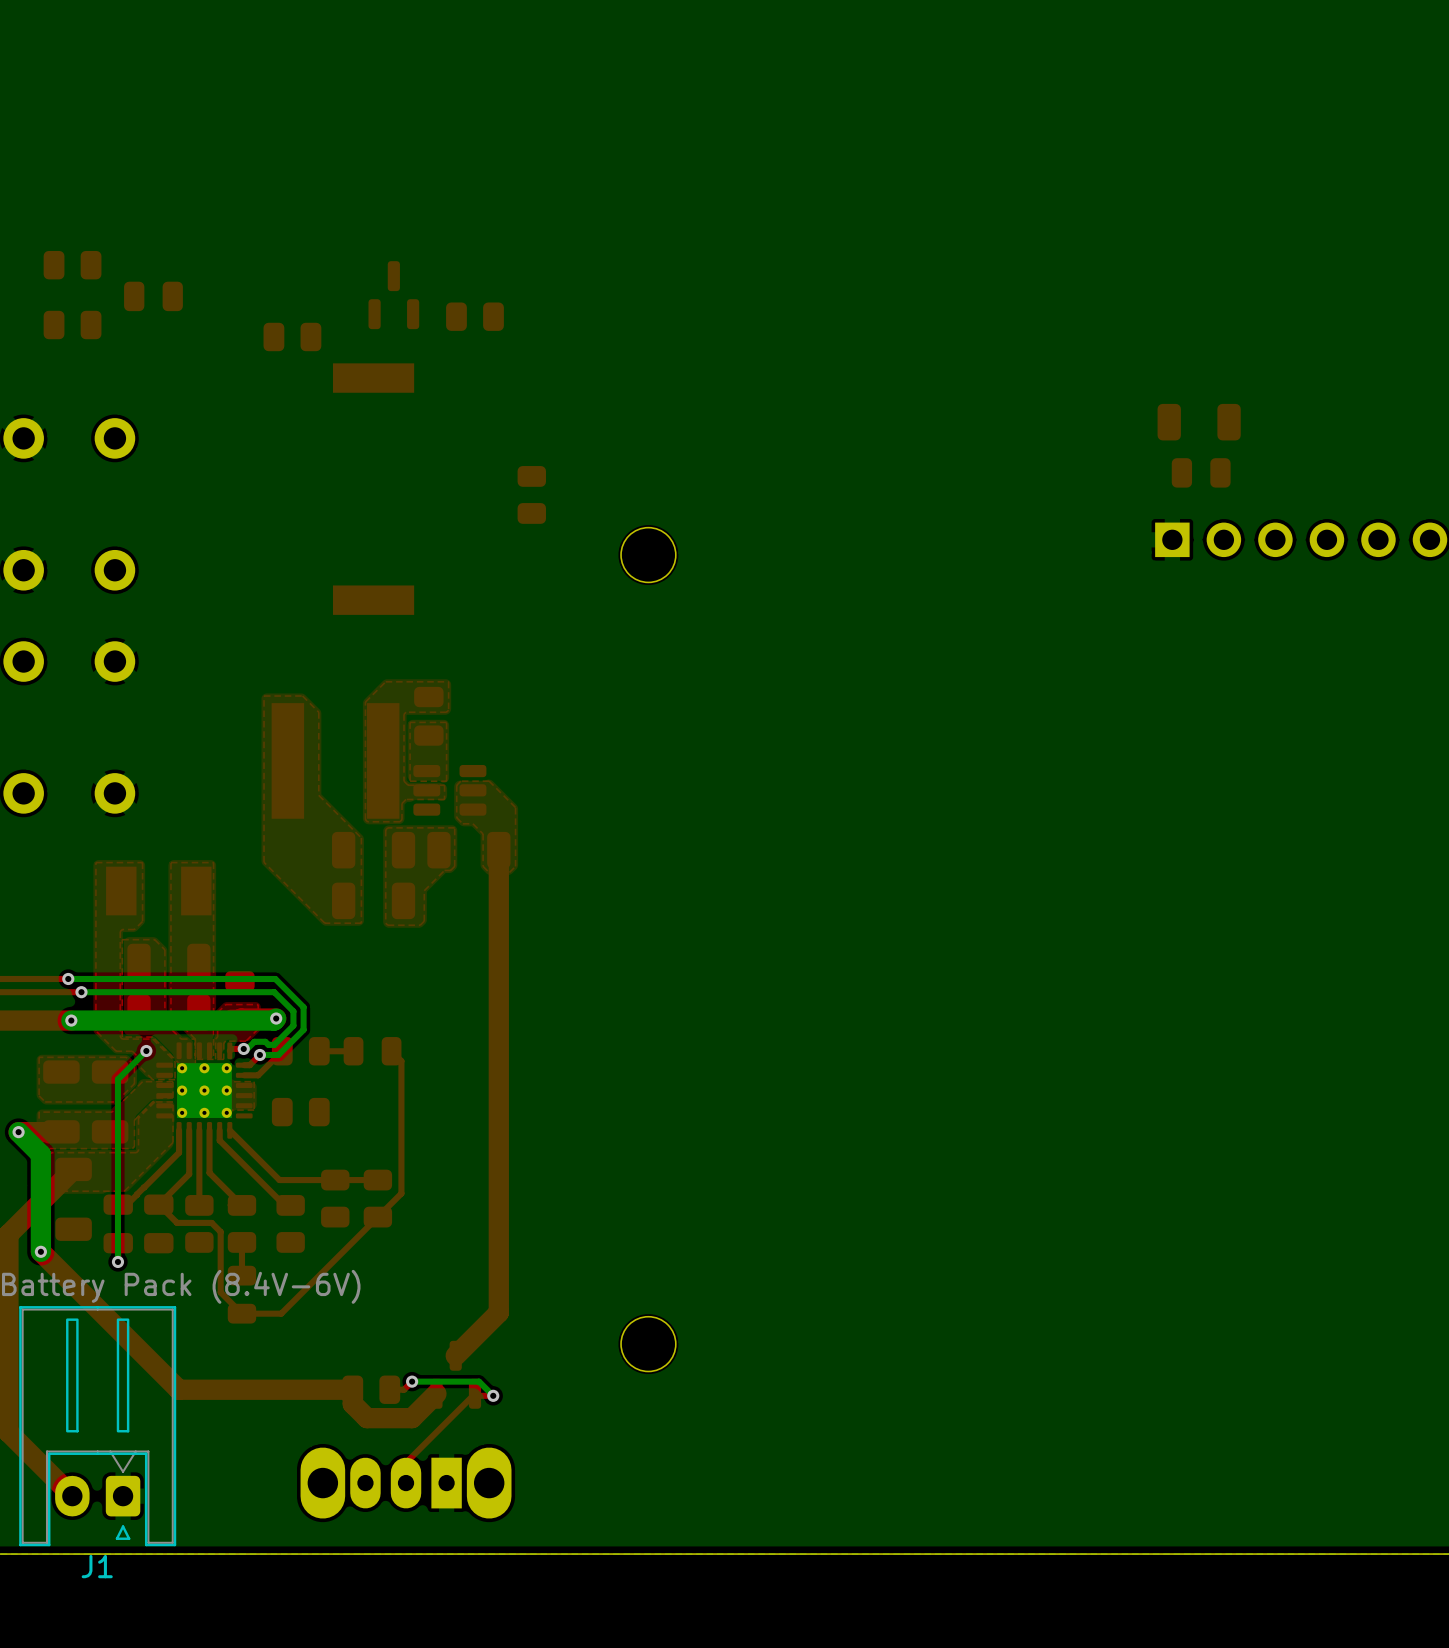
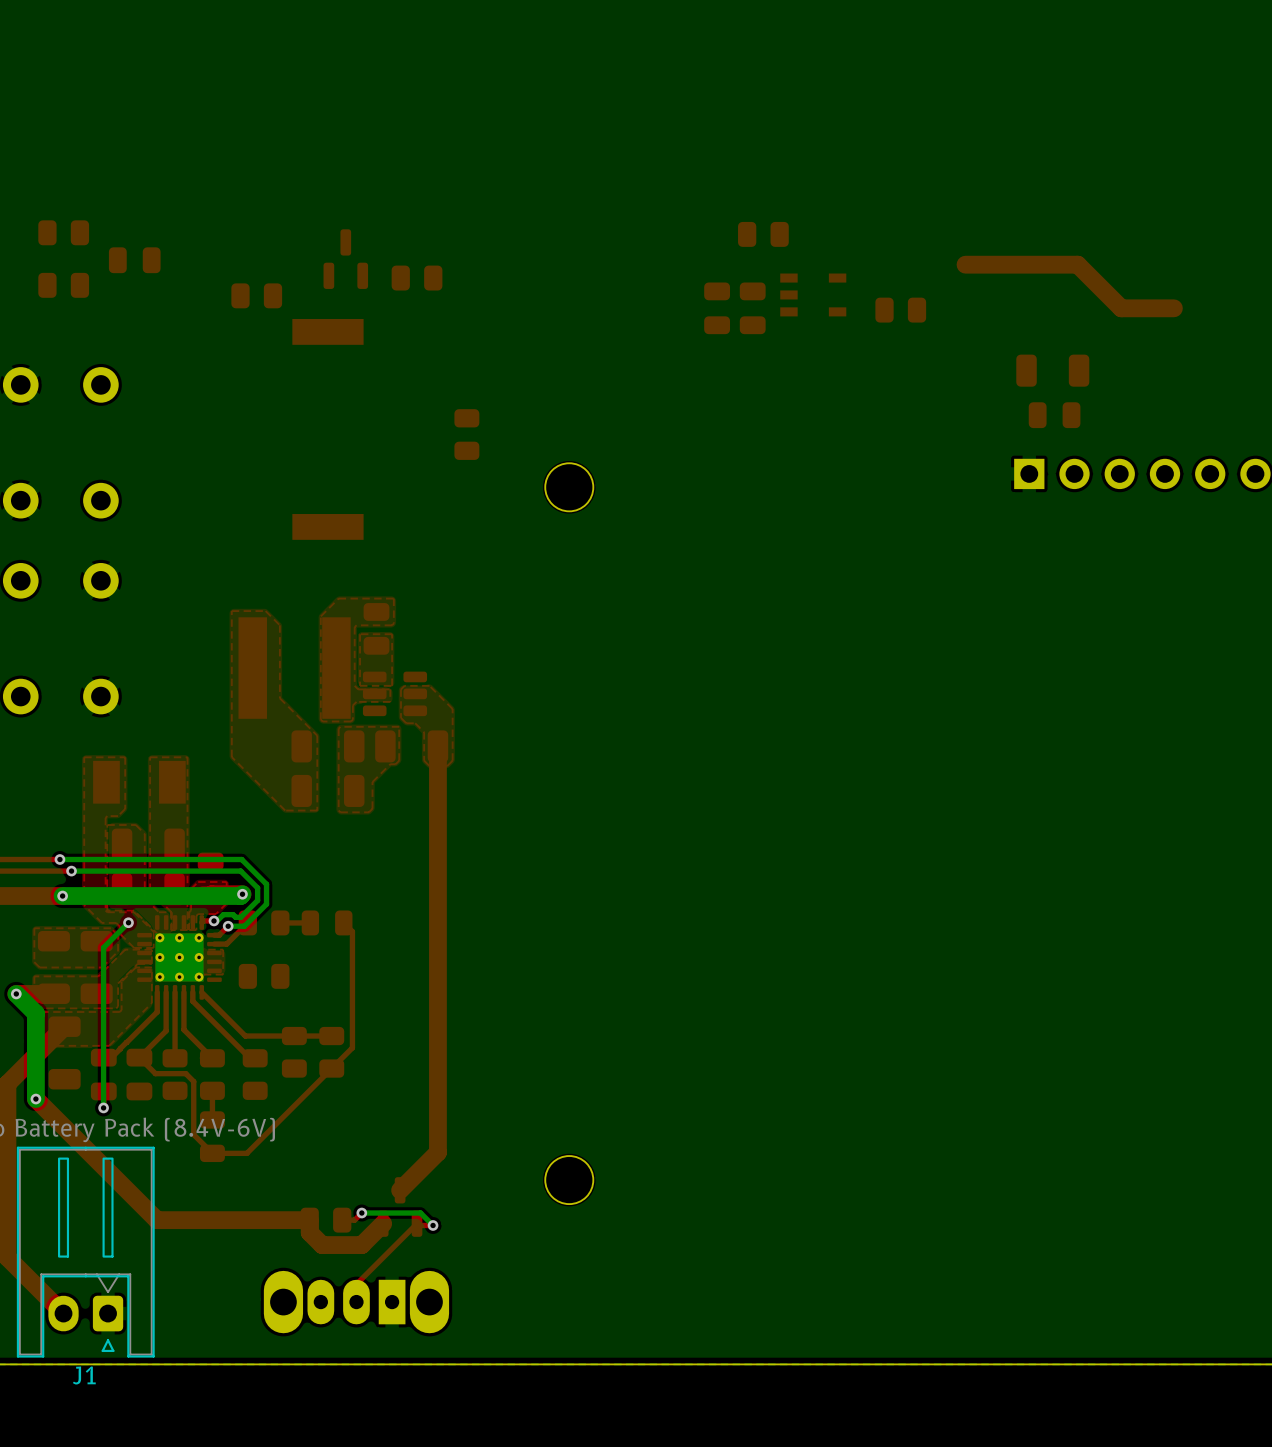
part: none -> (763, 234)
top track: none -> (965, 264) (1077, 264) (1121, 308) (1173, 308)
part: none -> (813, 294)
part: none -> (717, 308)
part: none -> (752, 308)
part: none -> (900, 310)

